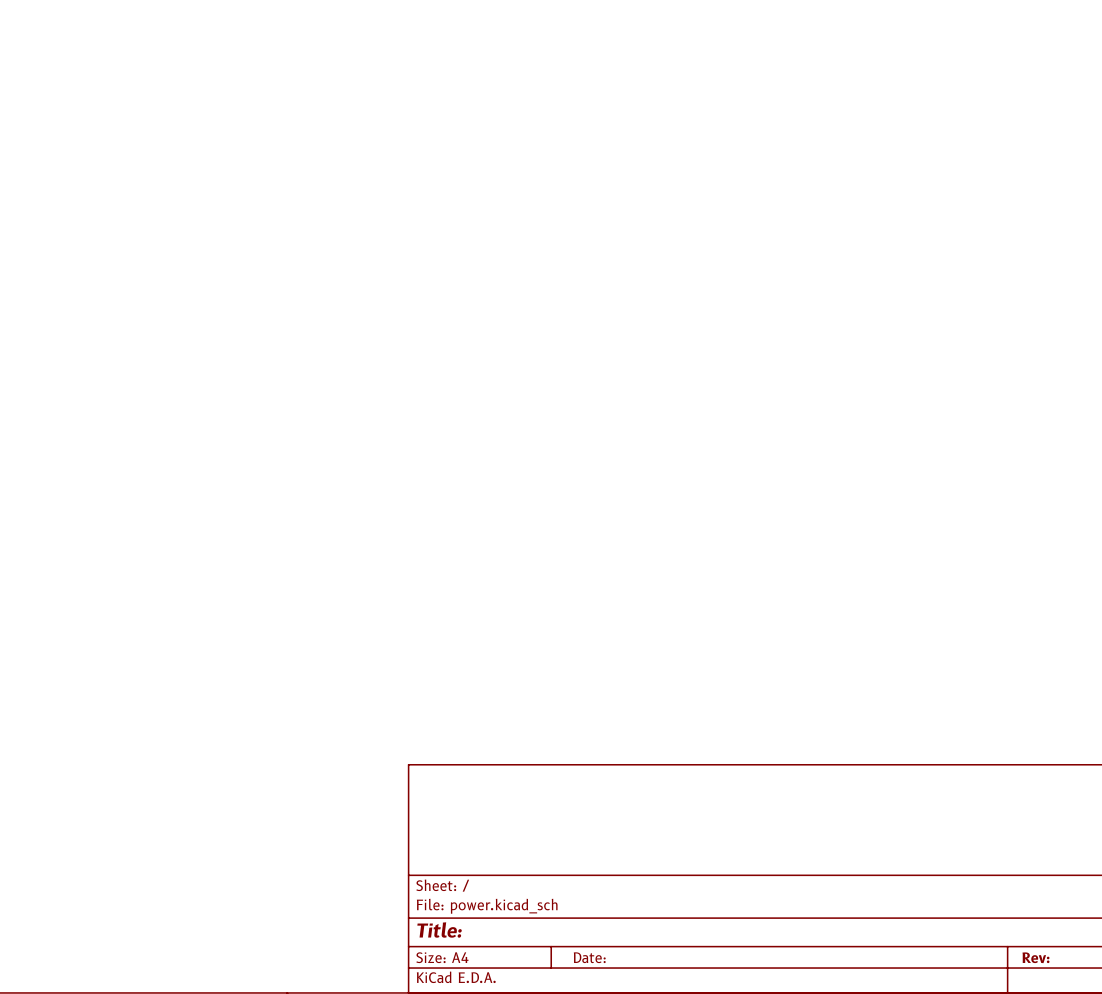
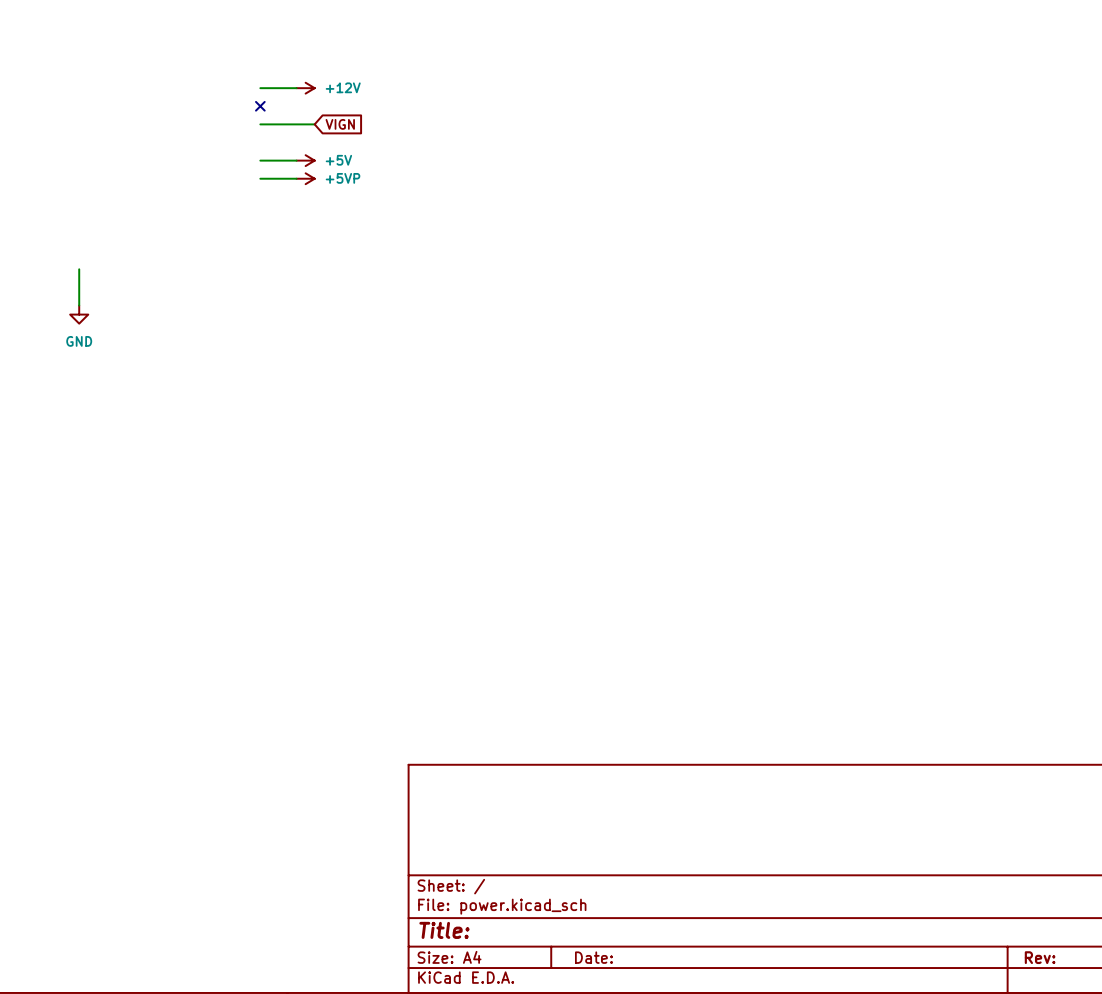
wire: none -> (260, 88) (296, 88)
power symbol: none -> +12V (305, 88)
no-connect mark: none -> (260, 106)
wire: none -> (260, 124) (314, 124)
global label: none -> VIGN (340, 124)
wire: none -> (260, 160) (296, 160)
power symbol: none -> +5V (305, 160)
wire: none -> (260, 178) (296, 178)
power symbol: none -> +5VP (305, 178)
wire: none -> (79, 269) (79, 305)
power symbol: none -> GND (79, 314)

